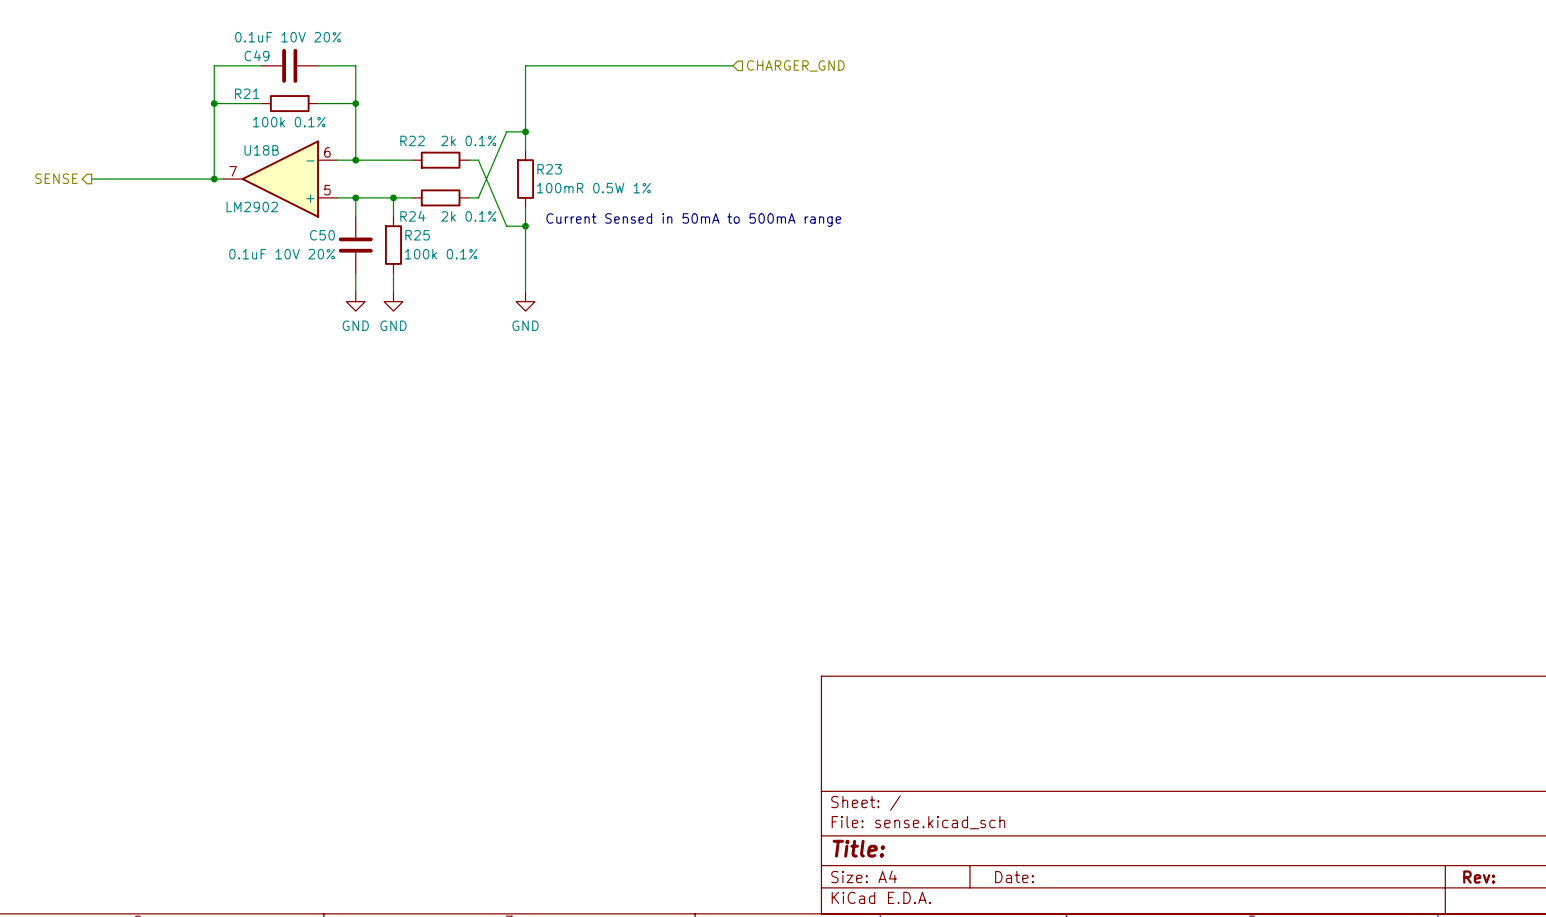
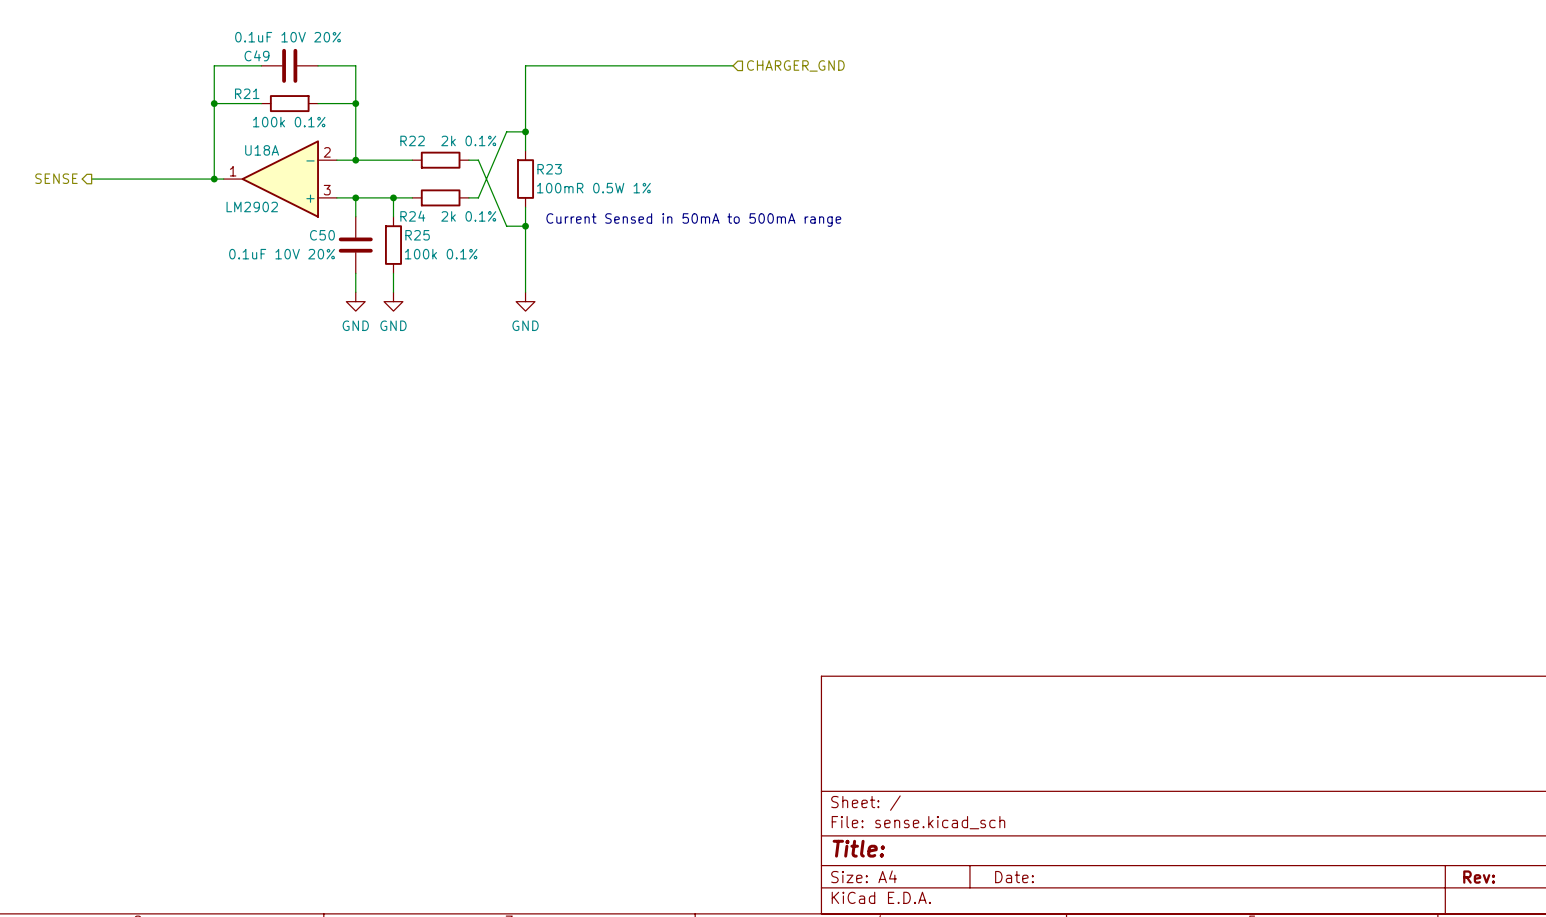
U18B name: U18B (261, 150) -> U18A (262, 150)
U18B pin number: 6 (327, 152) -> 2 (327, 152)
U18B pin number: 7 (233, 171) -> 1 (233, 171)
U18B pin number: 5 (327, 190) -> 3 (327, 190)

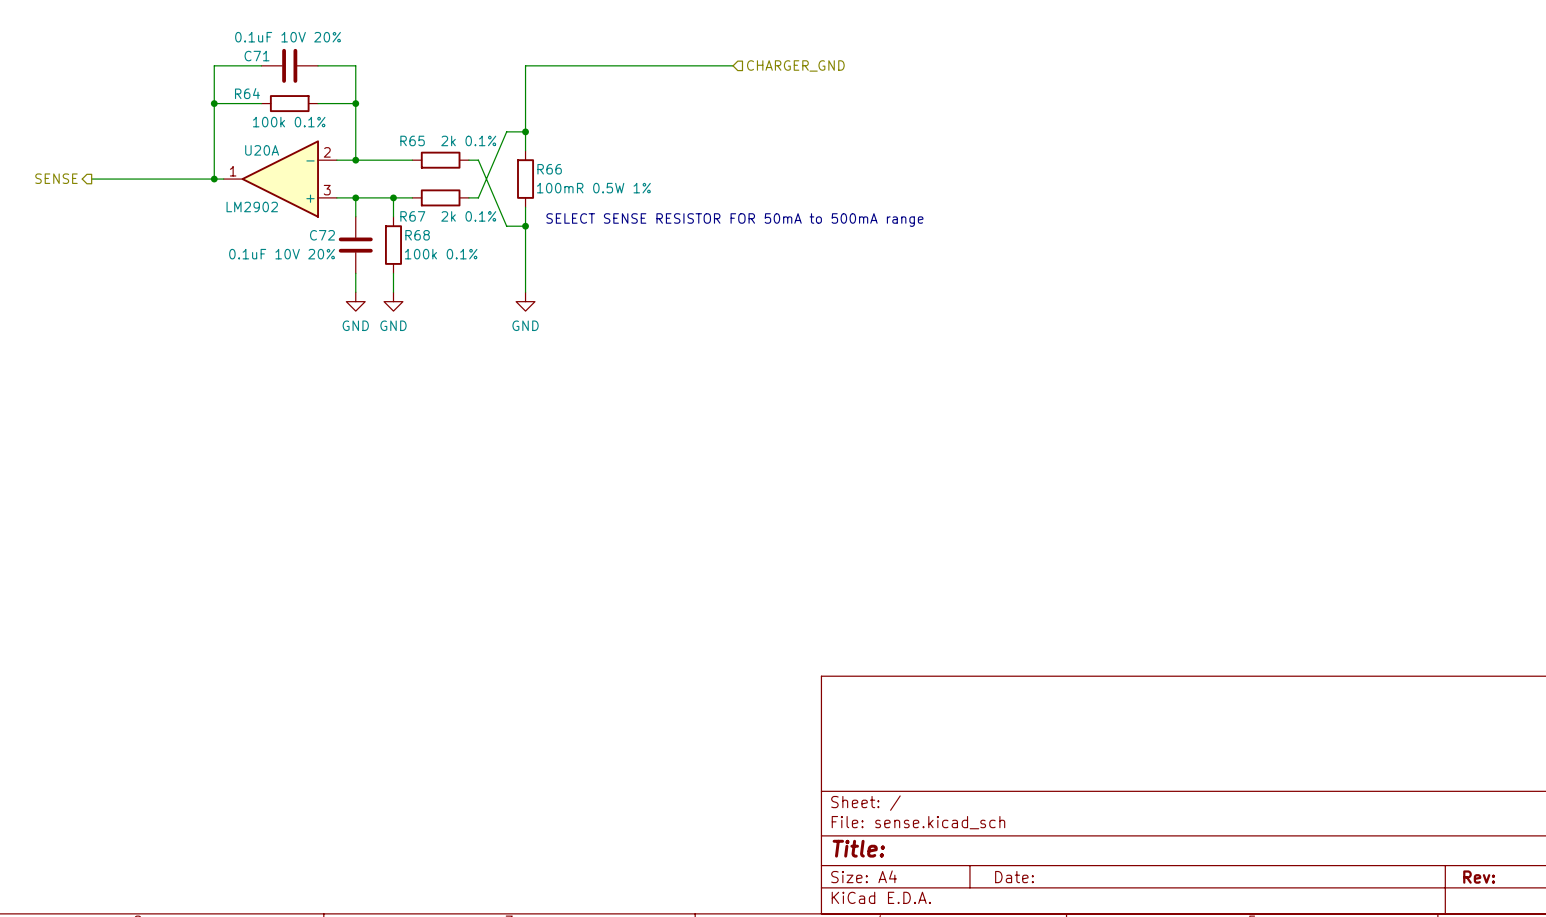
C49 name: C49 (257, 55) -> C71 (257, 56)
R21 name: R21 (247, 93) -> R64 (247, 93)
R22 name: R22 (412, 140) -> R65 (412, 140)
U18A name: U18A (262, 150) -> U20A (262, 150)
R23 name: R23 (549, 169) -> R66 (549, 169)
R24 name: R24 (412, 216) -> R67 (412, 216)
text: Current Sensed in 50mA to 500mA range (693, 220) -> SELECT SENSE RESISTOR FOR 50mA to 500mA range (734, 220)
C50 name: C50 (322, 235) -> C72 (322, 235)
R25 name: R25 (417, 235) -> R68 (417, 235)

